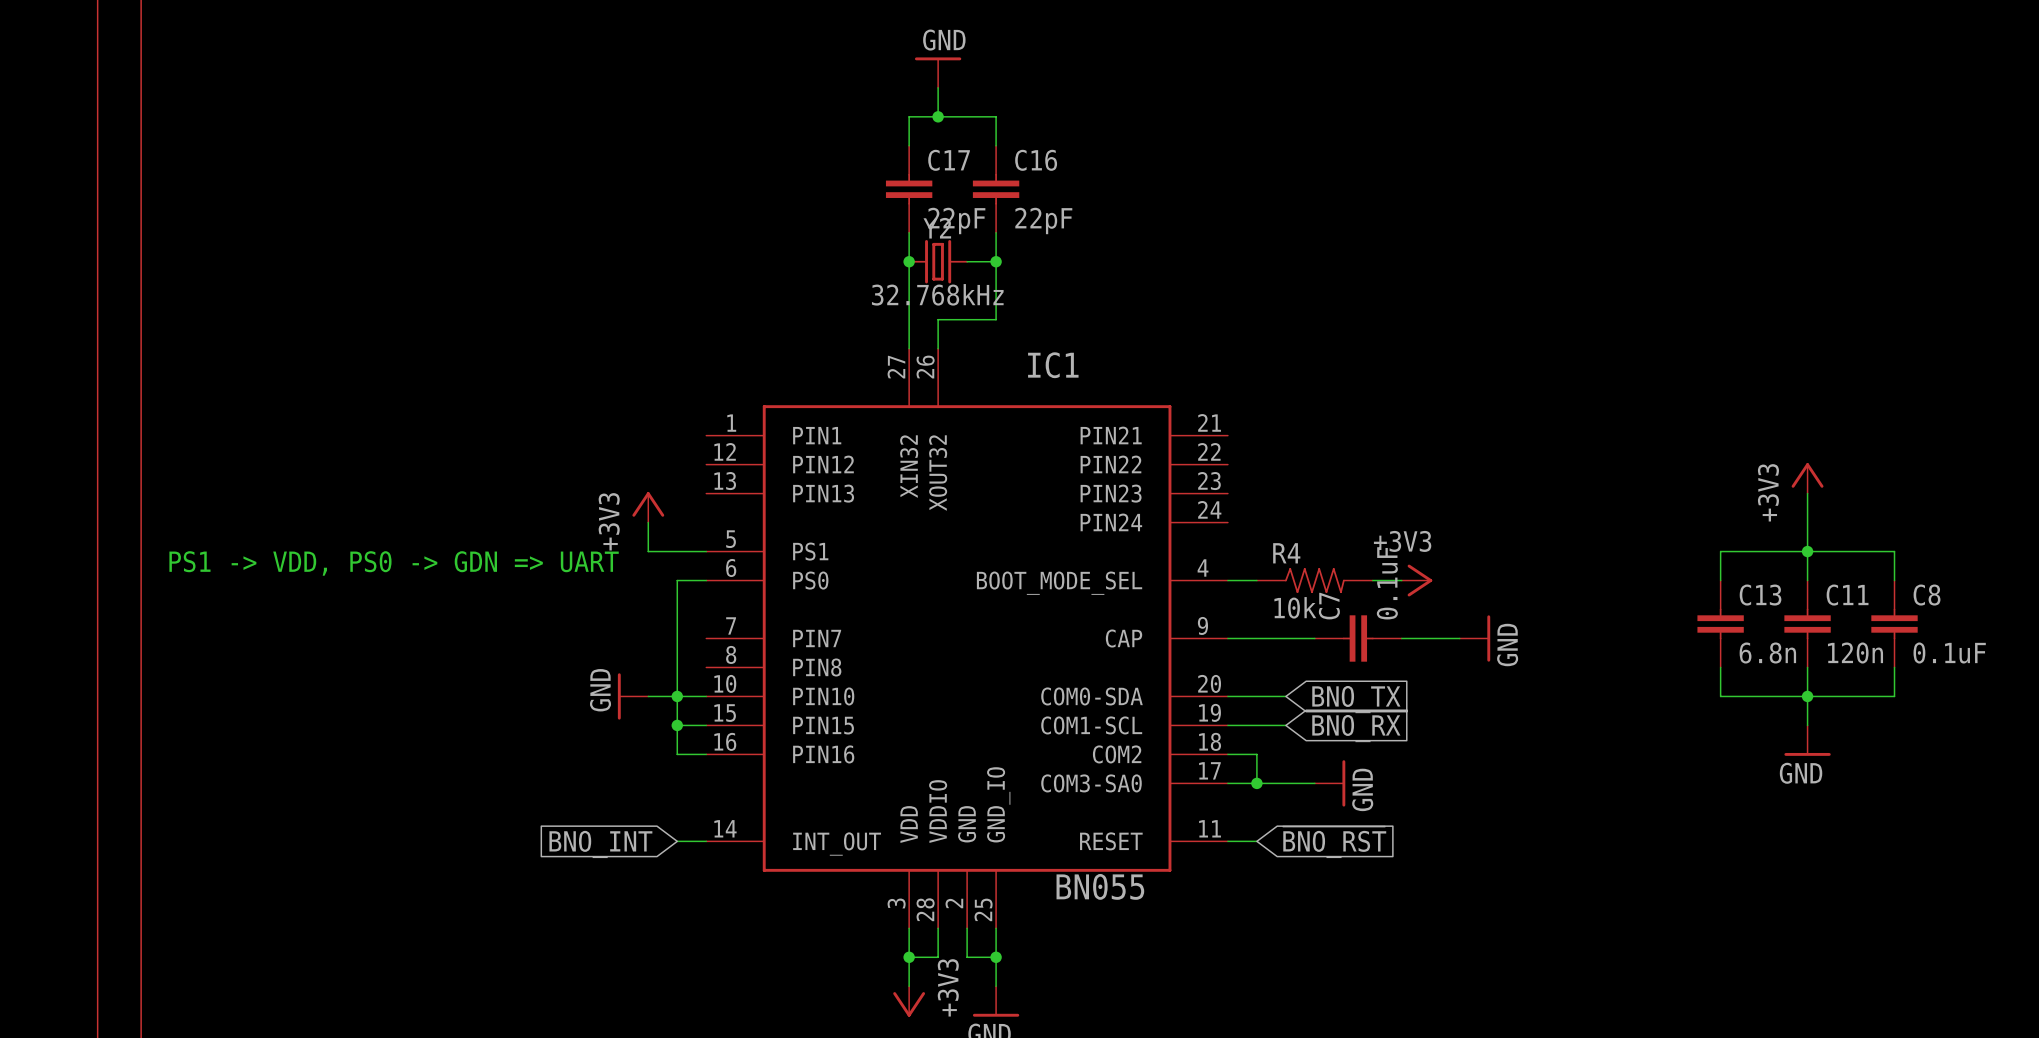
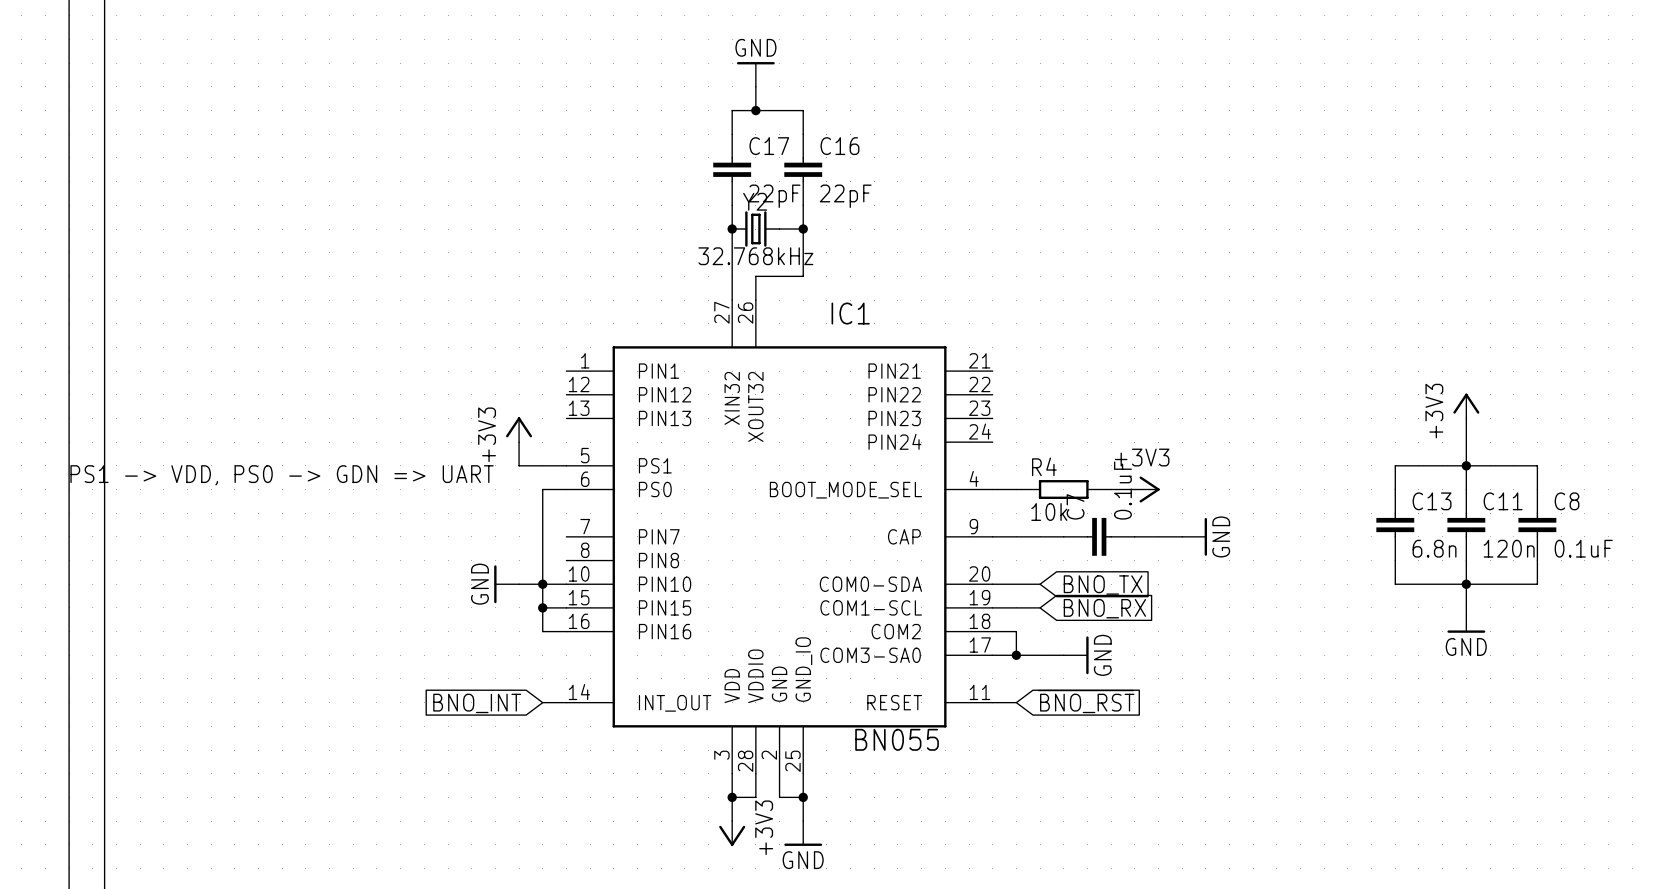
R4 symbol: [1256, 568, 1373, 593] -> [1016, 480, 1112, 499]

